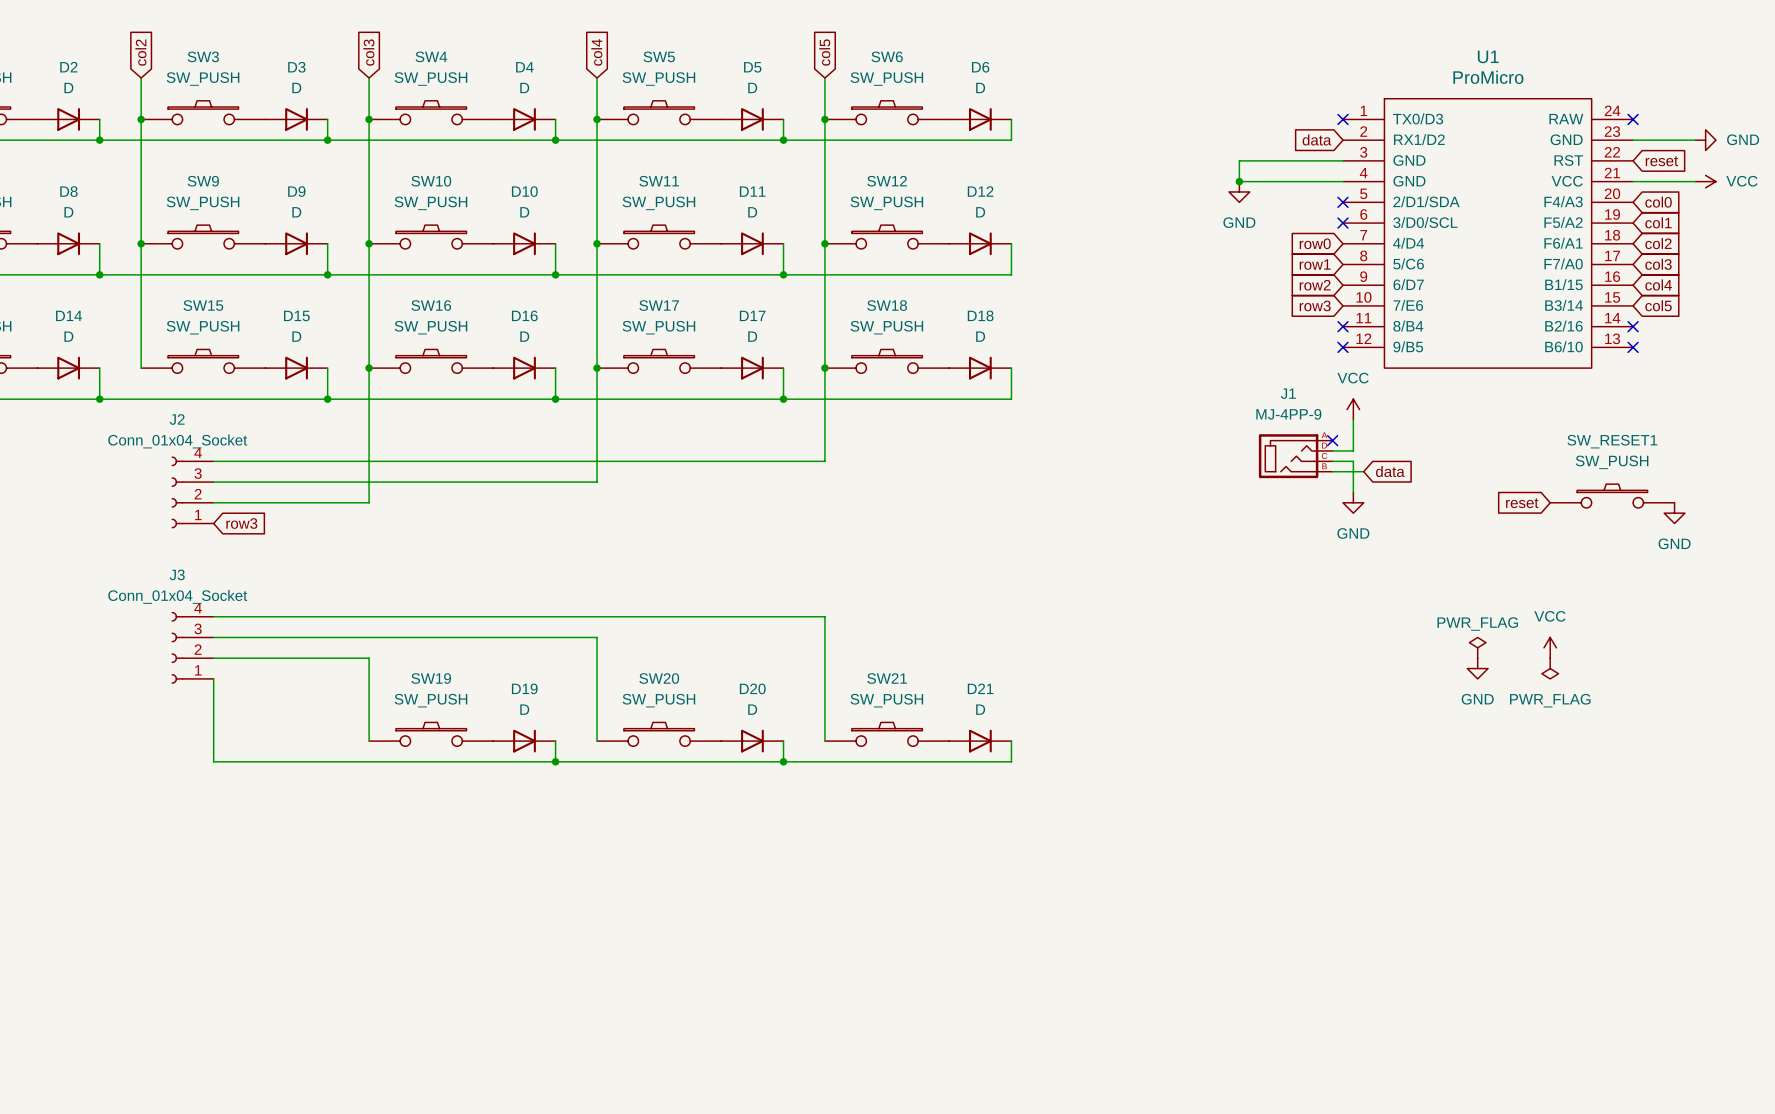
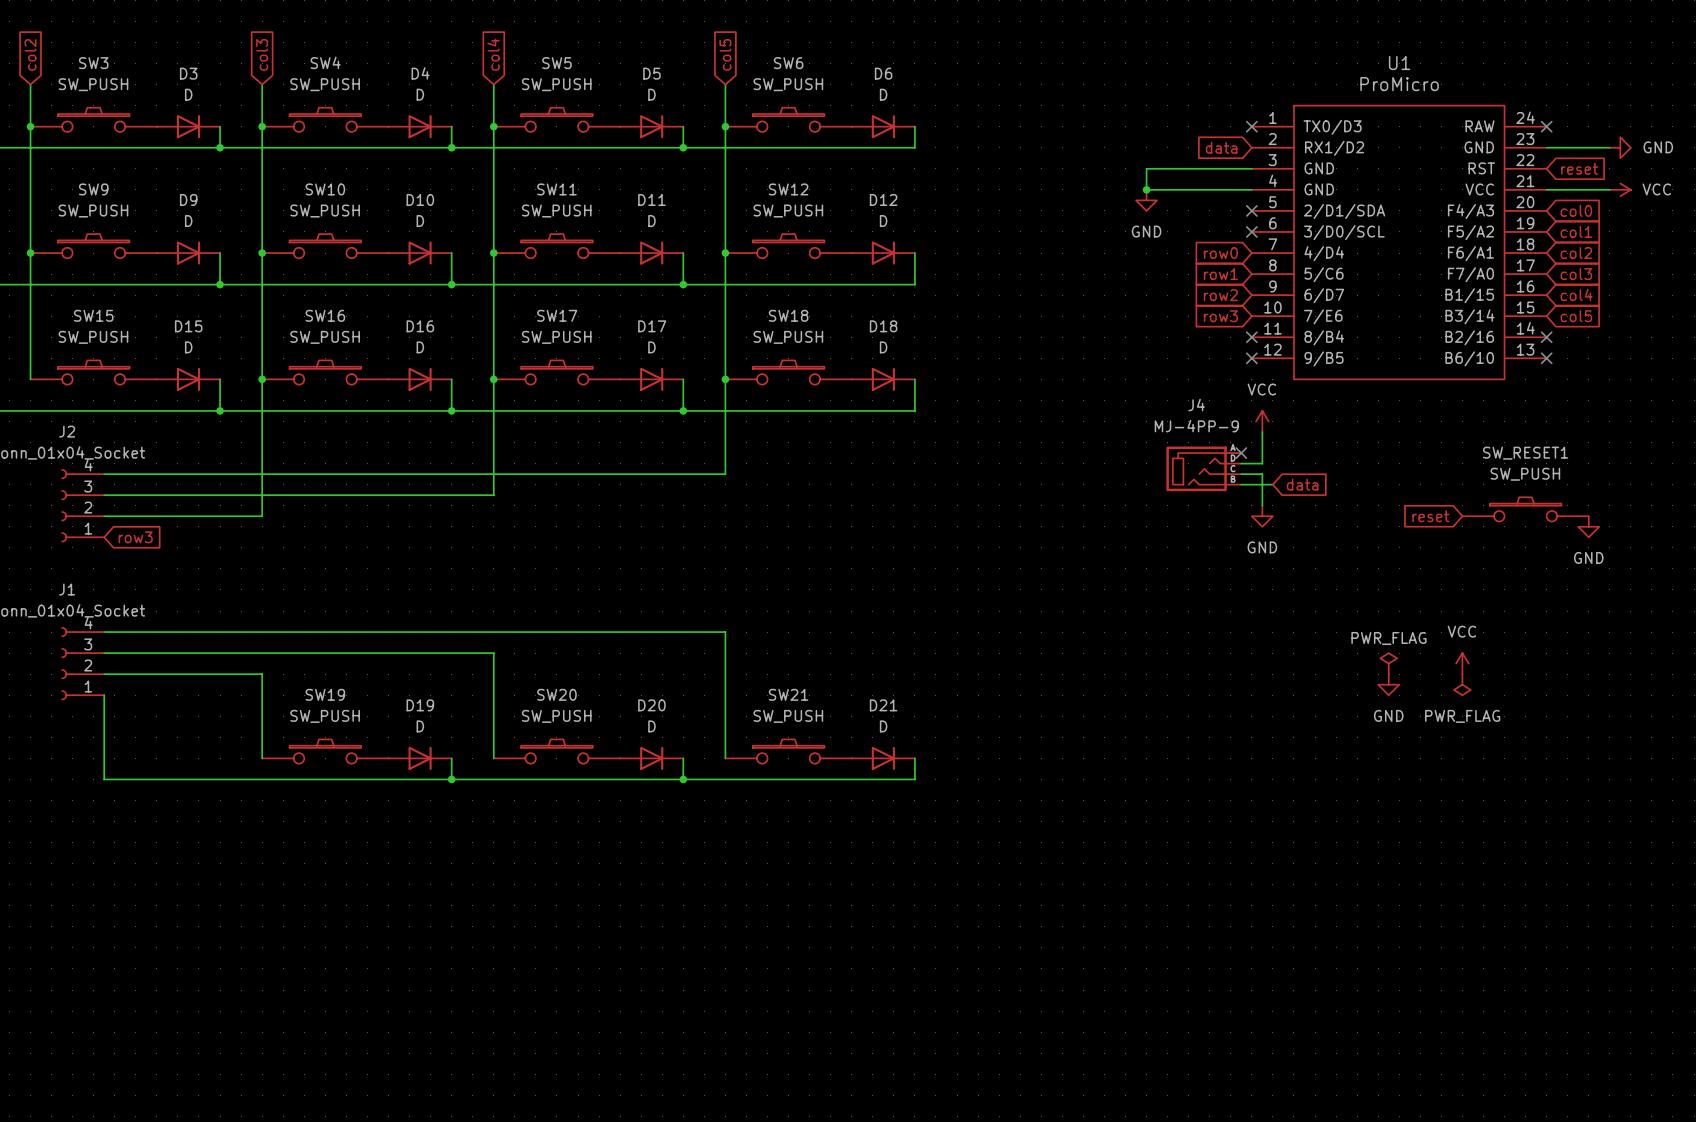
J1 name: J1 (1288, 393) -> J4 (1196, 405)
J3 name: J3 (177, 574) -> J1 (67, 589)

